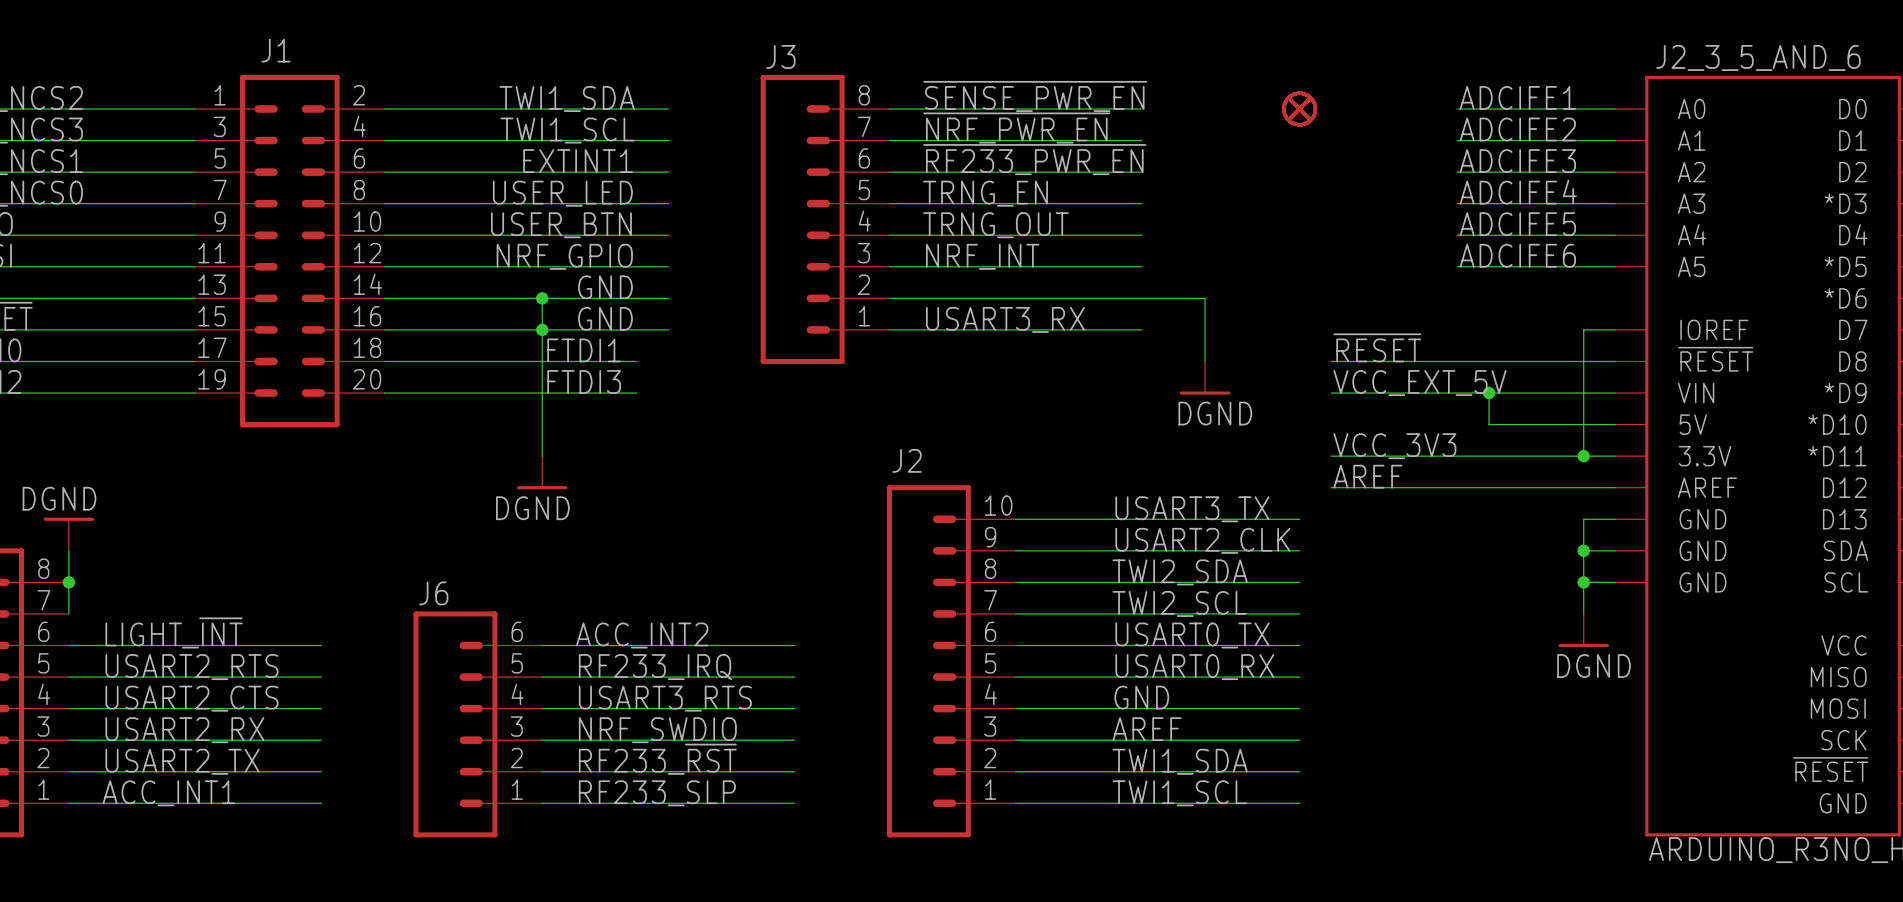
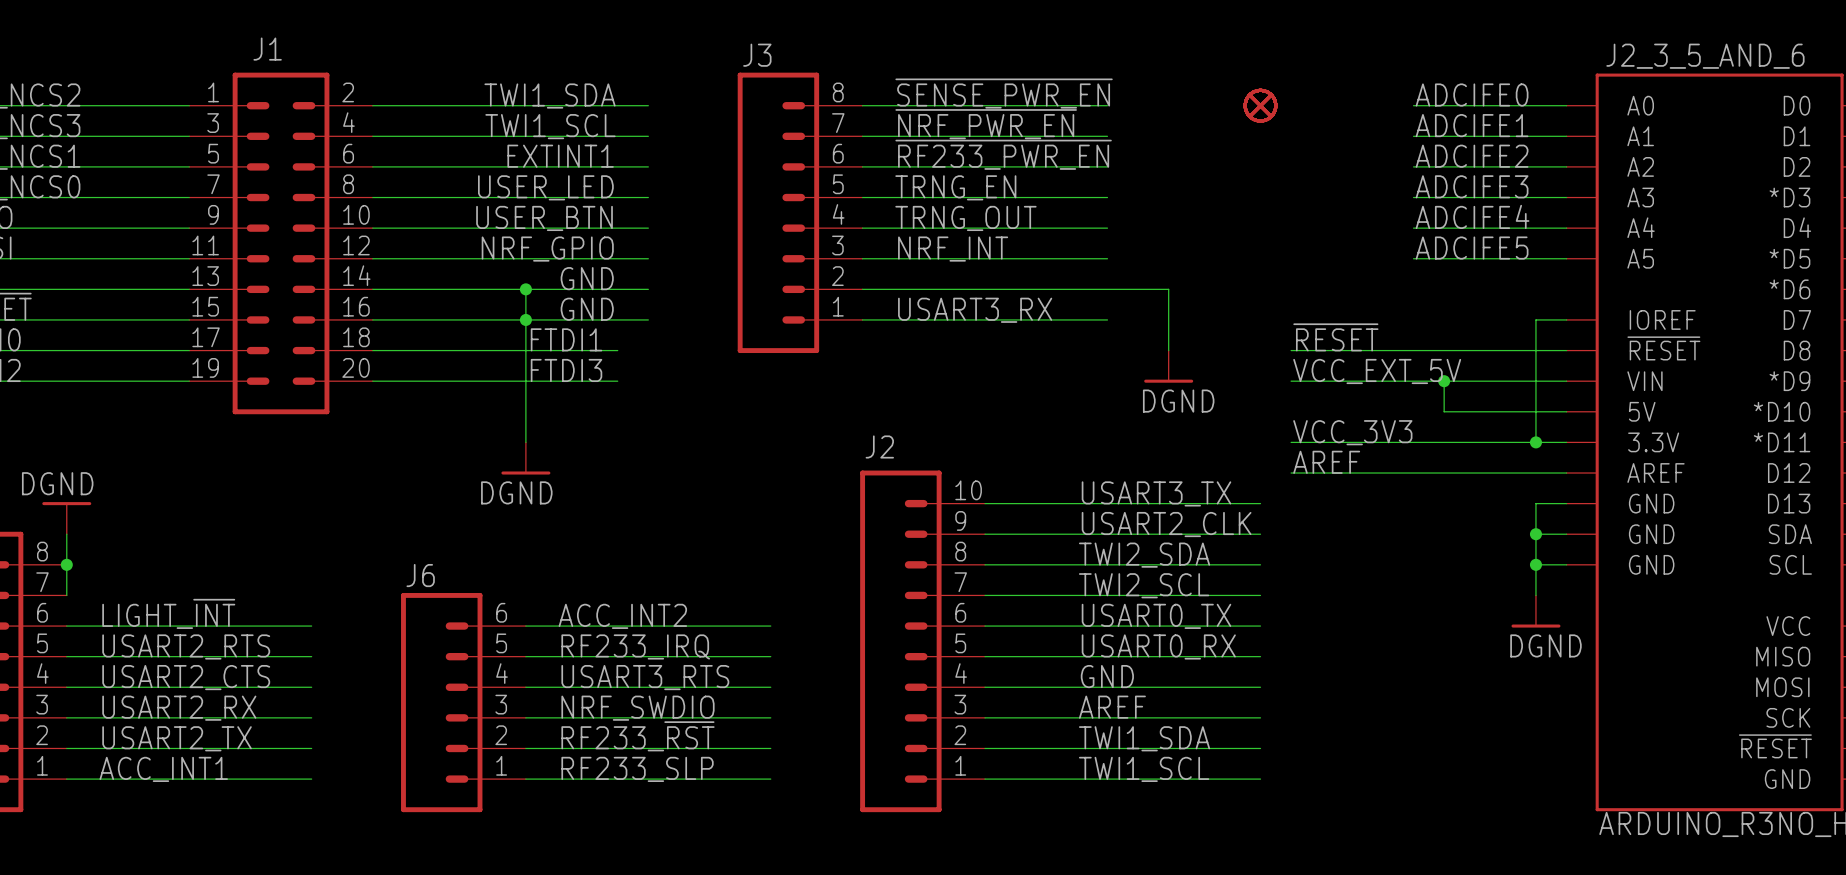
label: ADCIFE1 (1517, 97) -> ADCIFE0 (1472, 94)
label: ADCIFE2 (1517, 129) -> ADCIFE1 (1472, 125)
label: ADCIFE3 (1517, 161) -> ADCIFE2 (1472, 156)
label: ADCIFE4 (1518, 192) -> ADCIFE3 (1472, 186)
label: ADCIFE5 (1517, 224) -> ADCIFE4 (1472, 216)
label: ADCIFE6 (1517, 255) -> ADCIFE5 (1472, 248)

